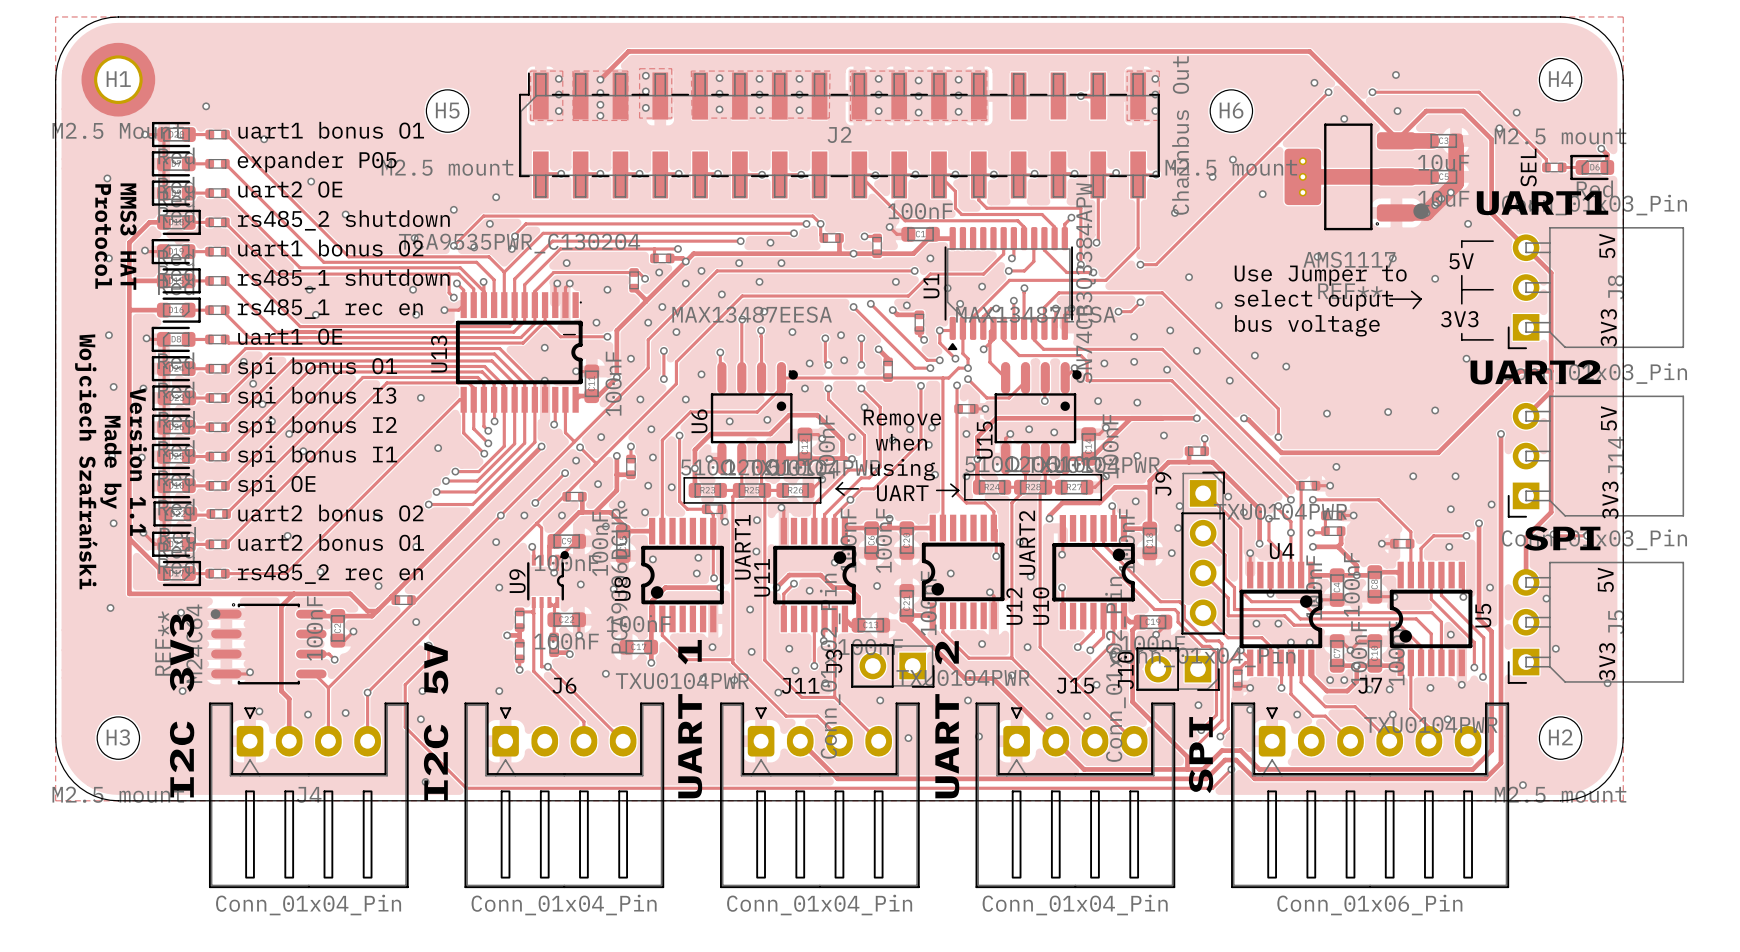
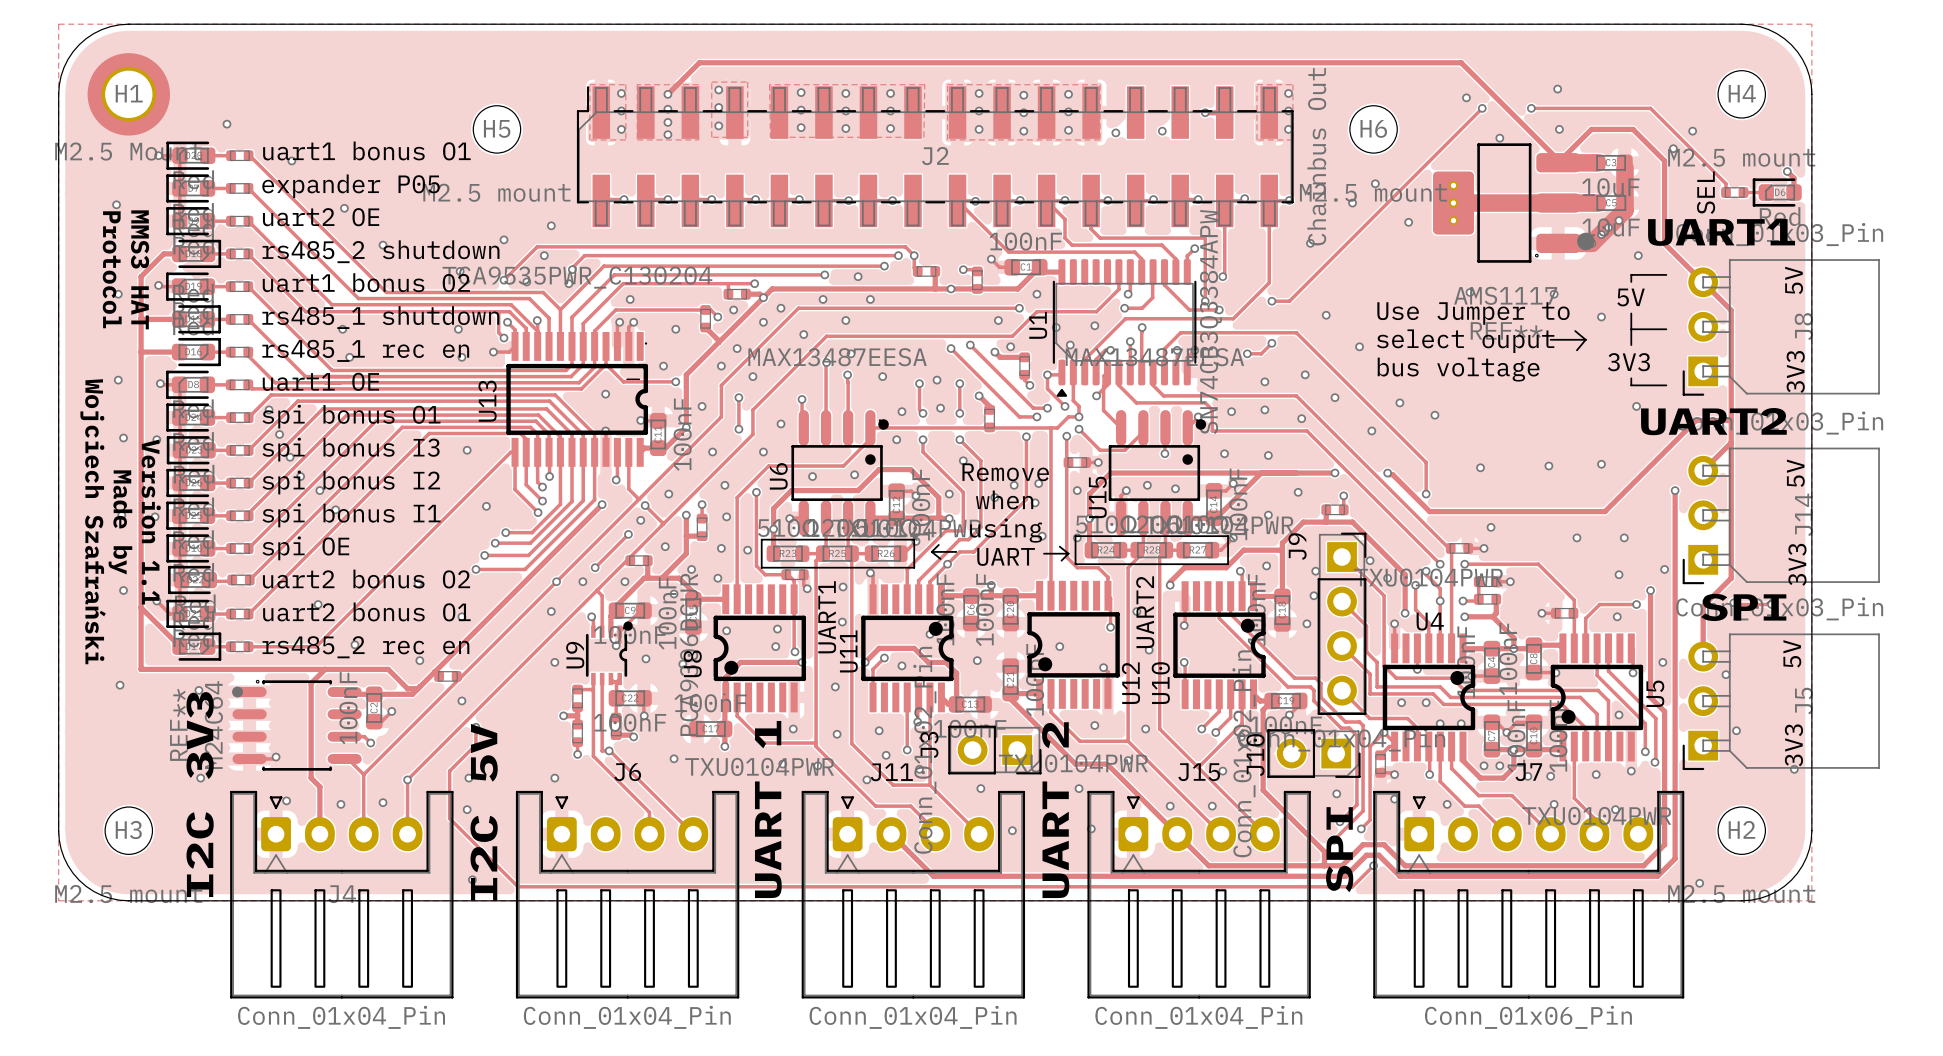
via: none -> (1162, 131)
via: none -> (1115, 132)

